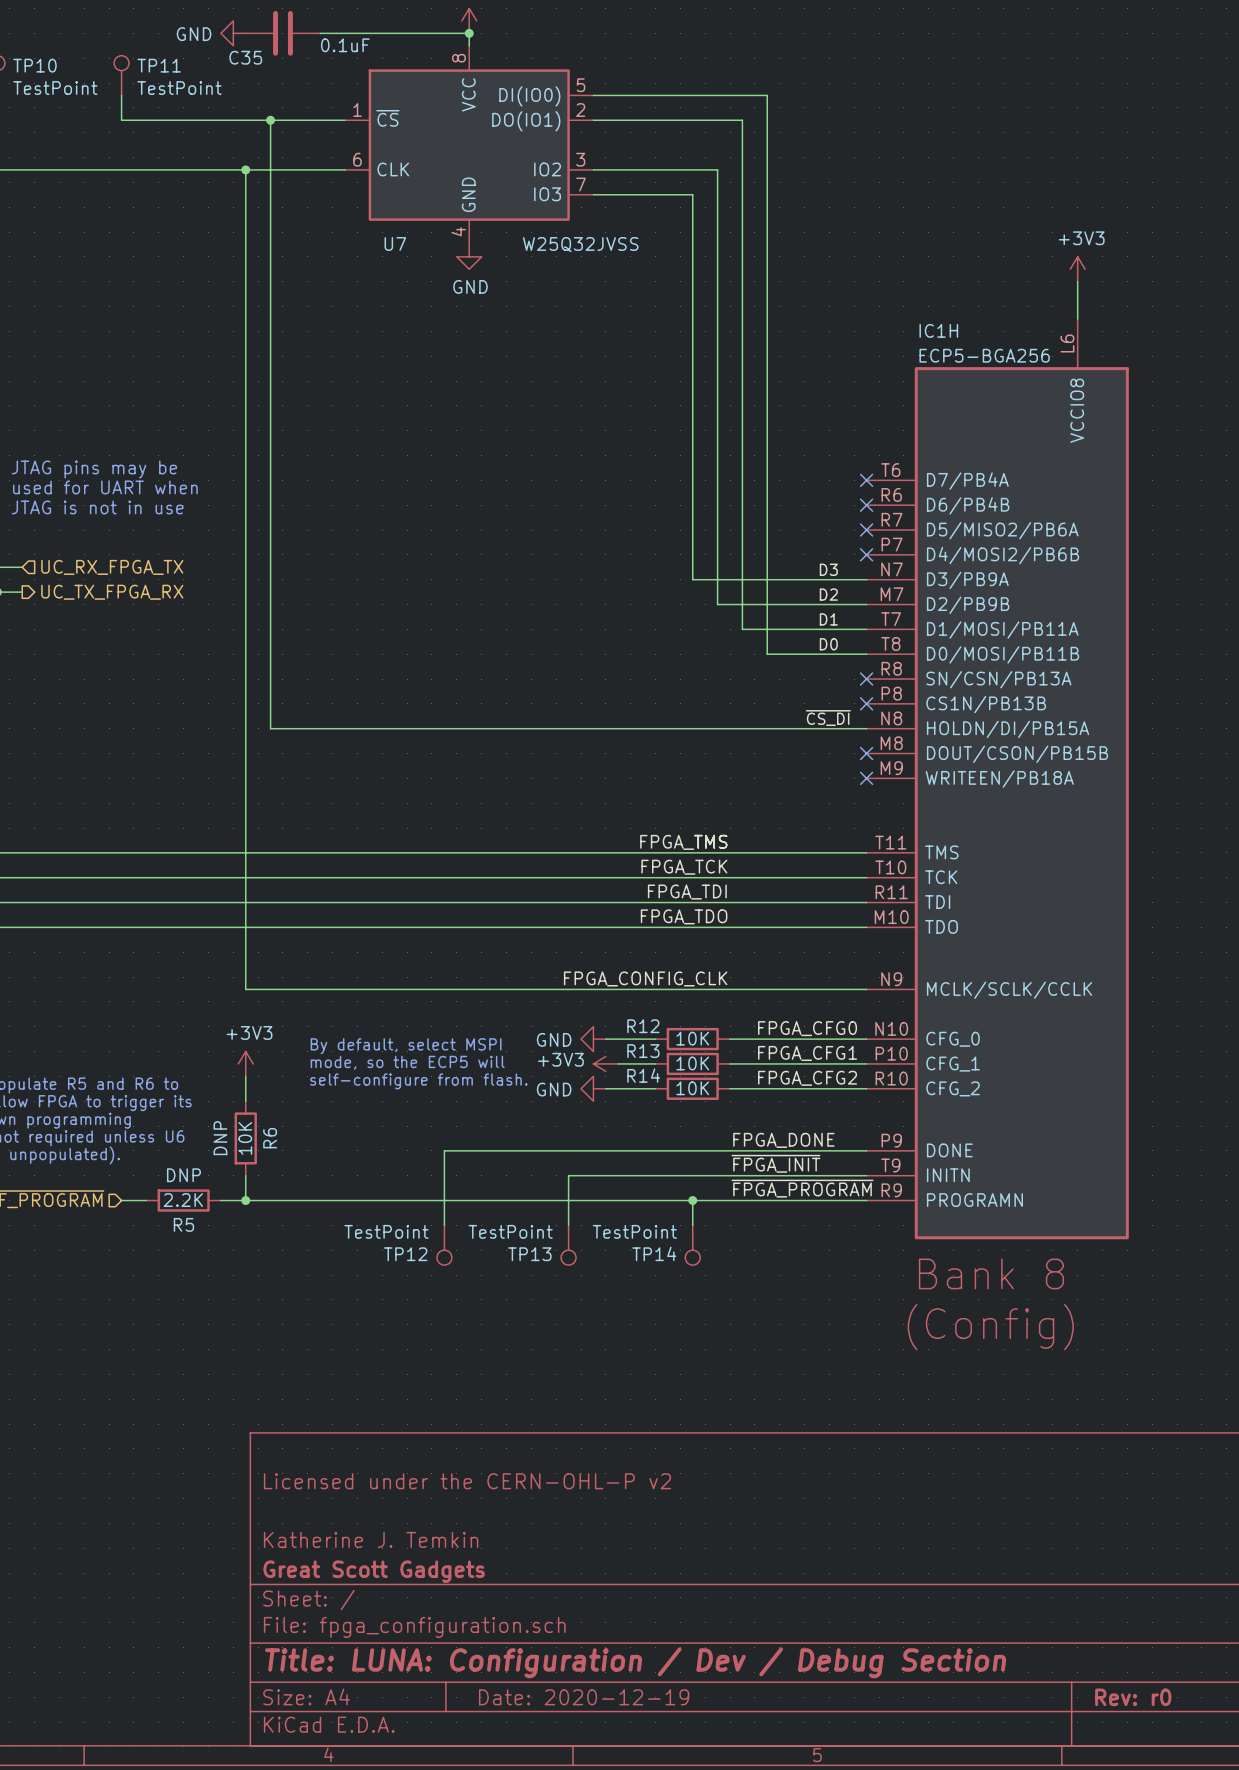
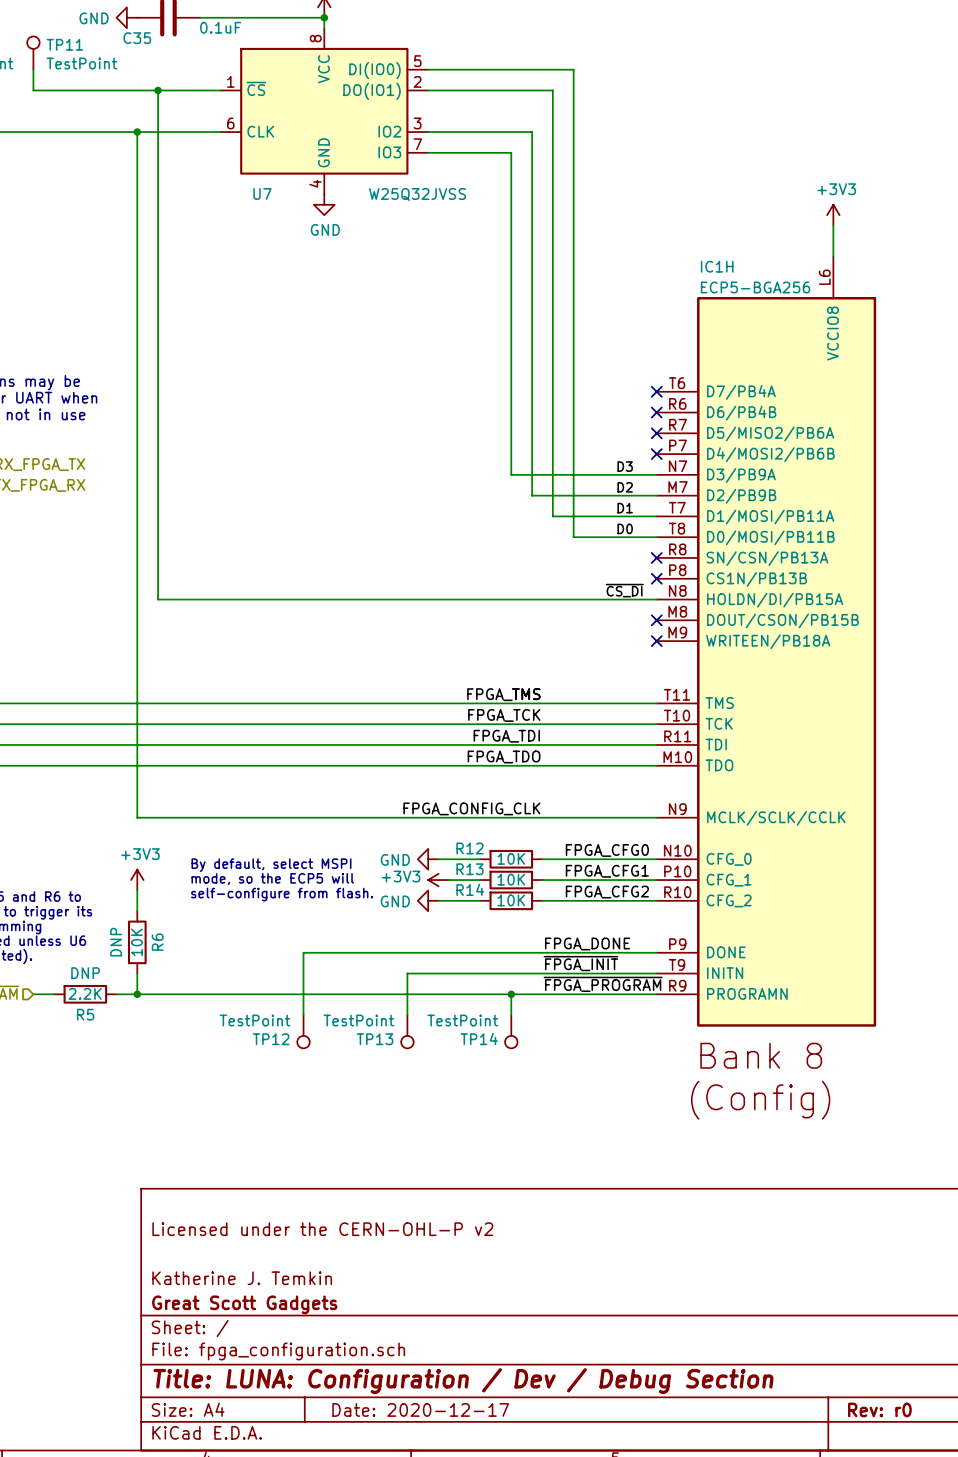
title block: Date: 2020-12-19 (584, 1697) -> Date: 2020-12-17 (420, 1409)

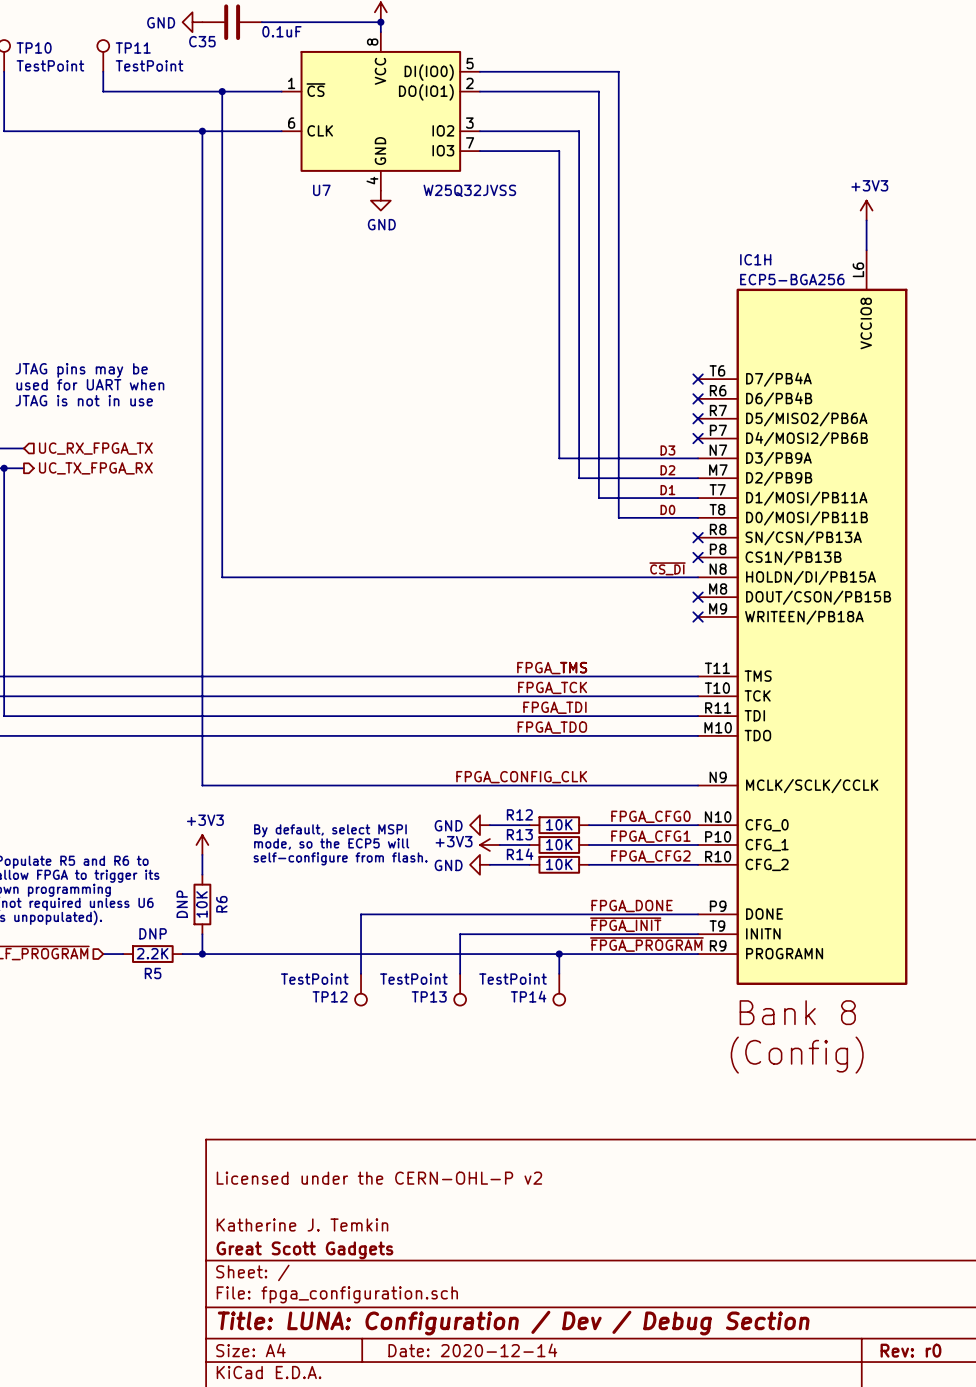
title block: Date: 2020-12-17 (420, 1409) -> Date: 2020-12-14 (472, 1350)

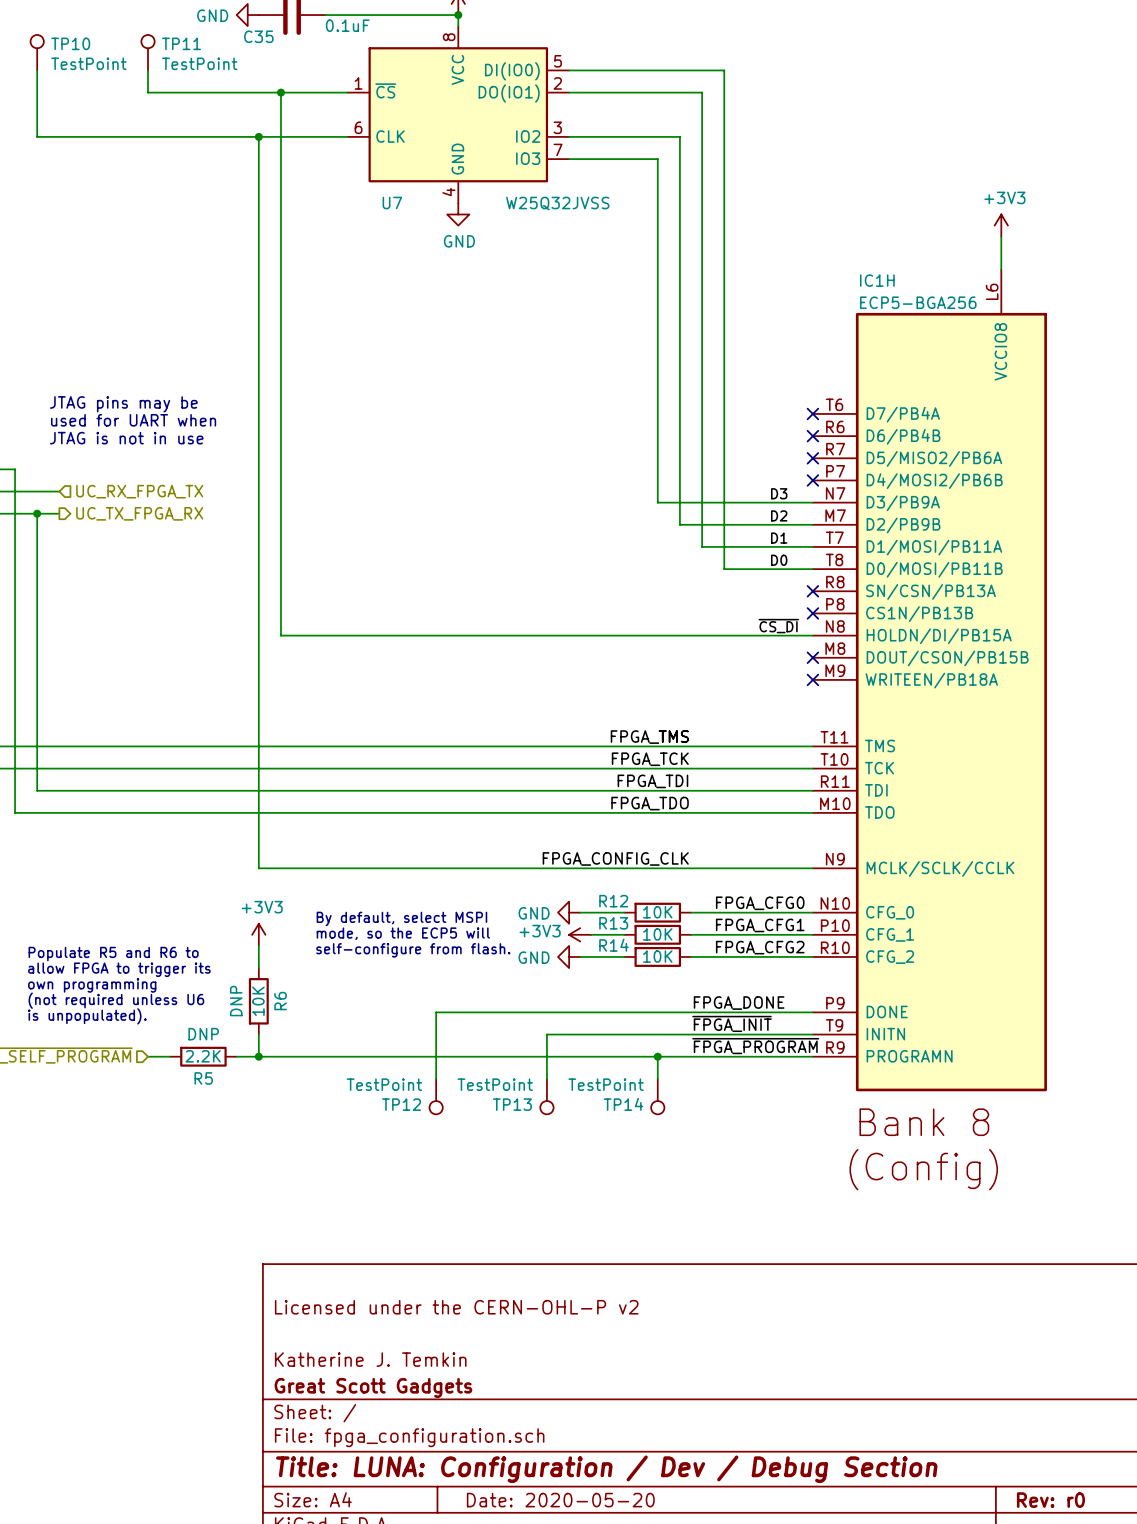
title block: Date: 2020-12-14 (472, 1350) -> Date: 2020-05-20 (560, 1500)

